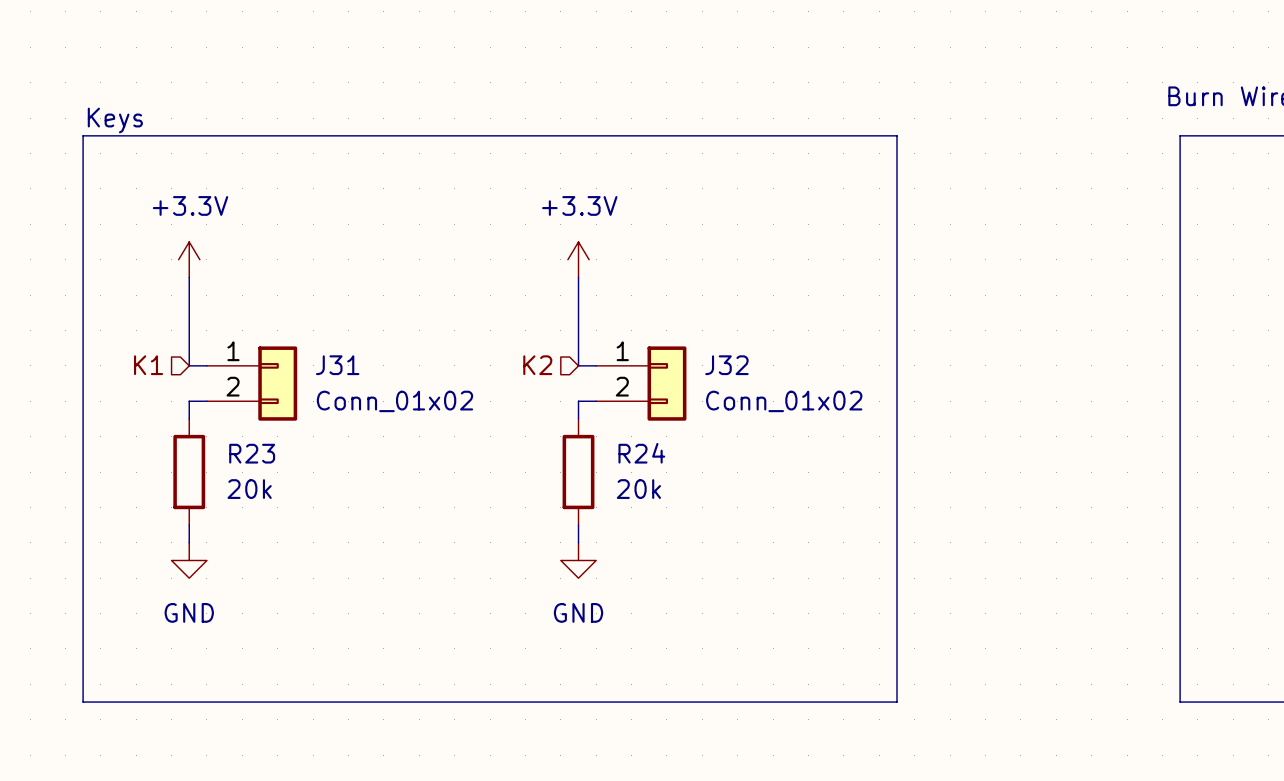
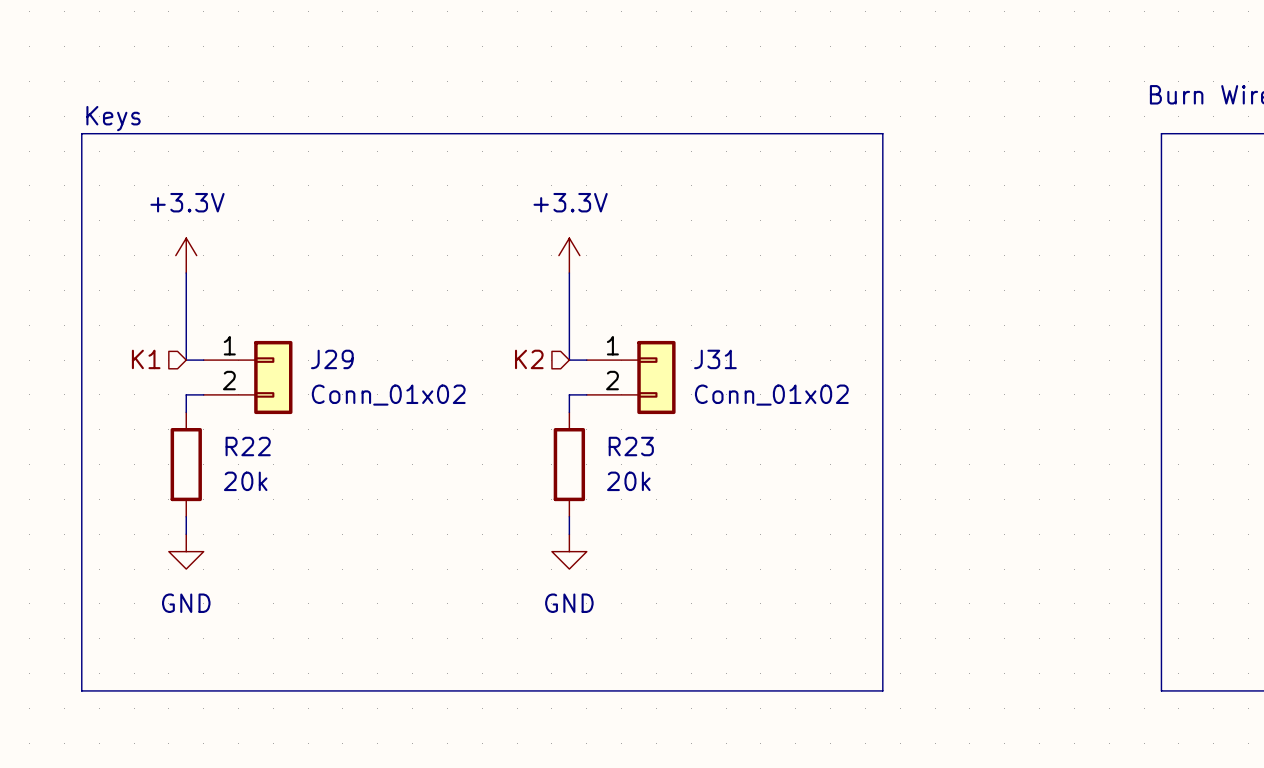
J31 name: J31 (337, 365) -> J29 (332, 359)
J32 name: J32 (726, 365) -> J31 (715, 359)
R23 name: R23 (252, 453) -> R22 (248, 446)
R24 name: R24 (641, 453) -> R23 (631, 446)

